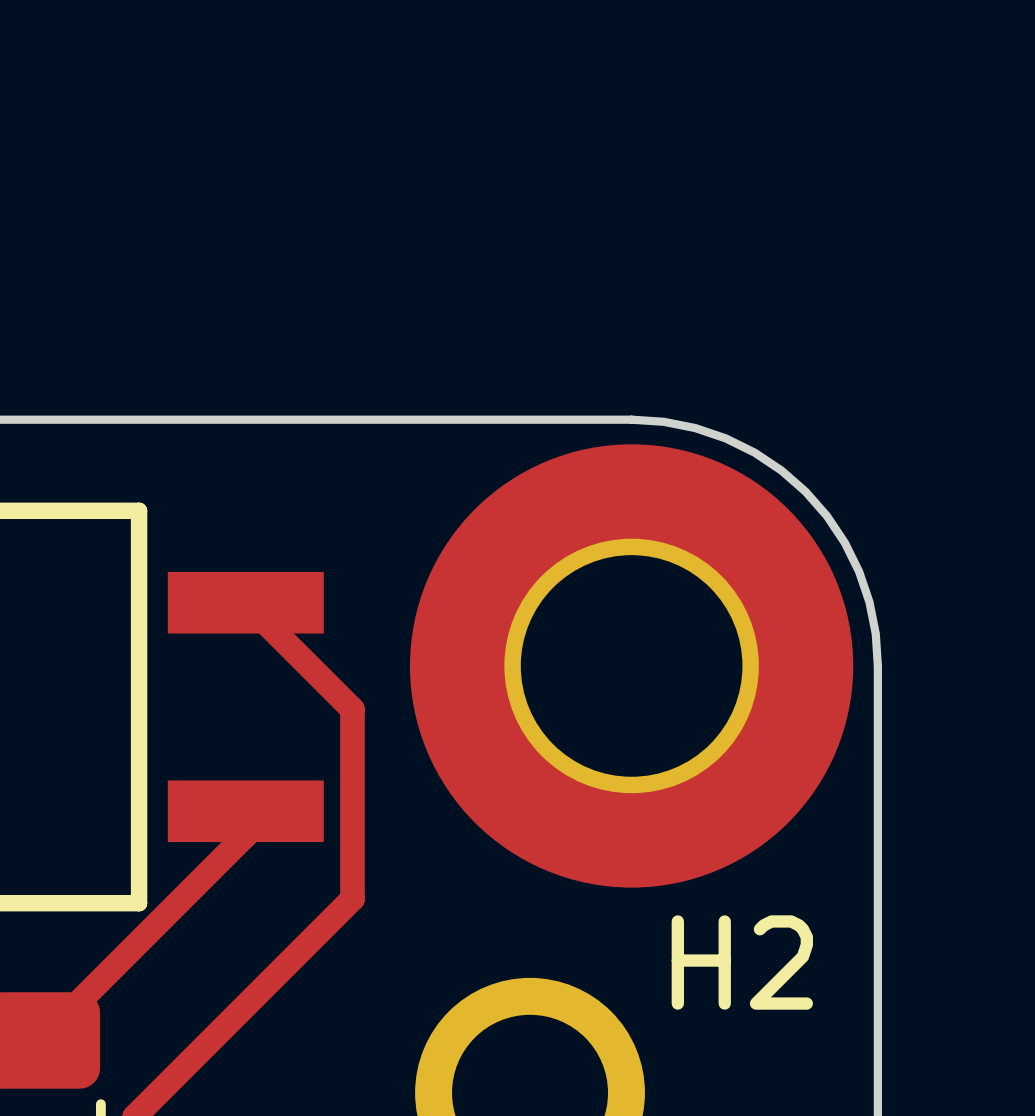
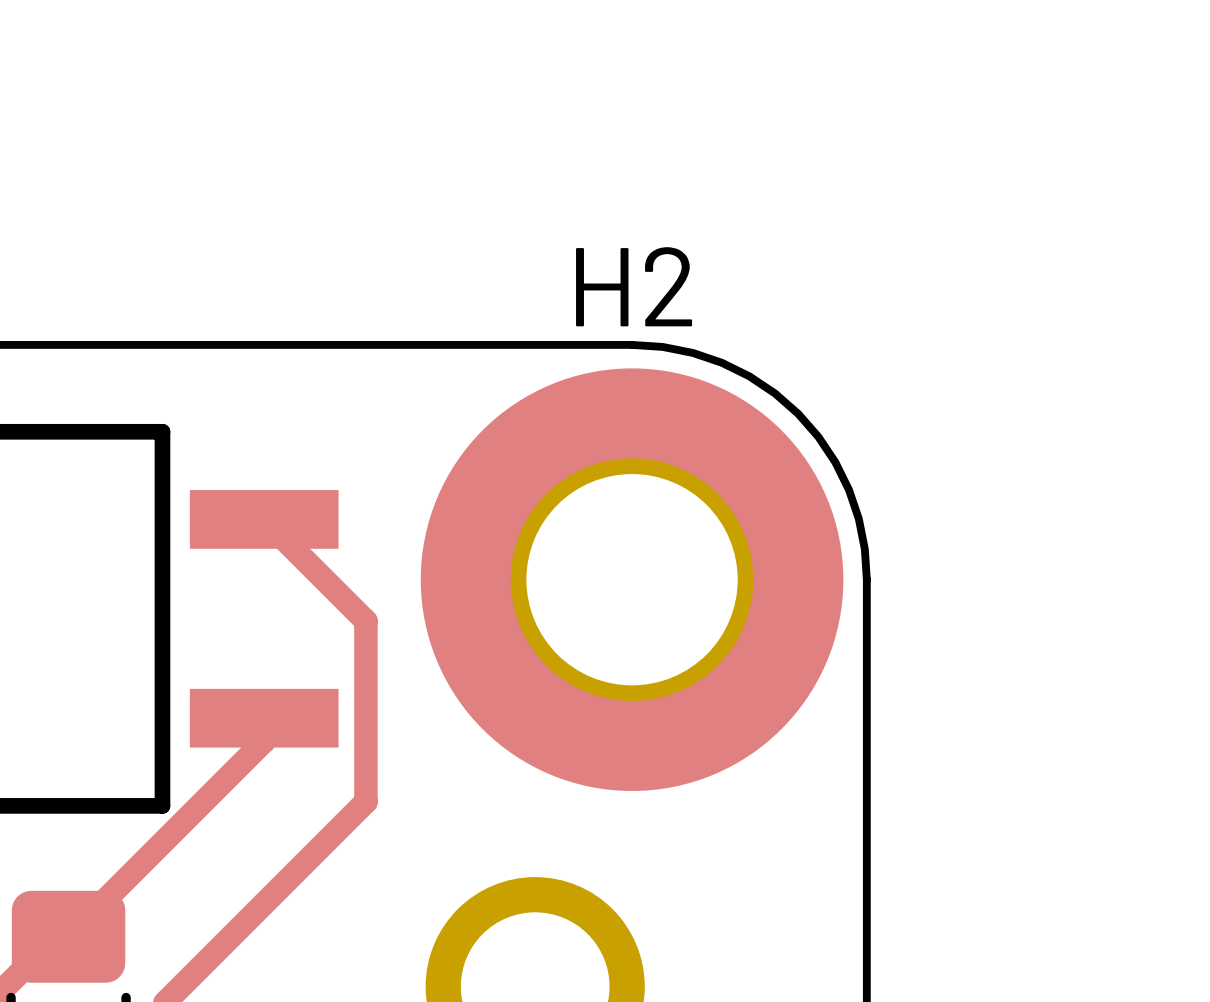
H2 name position: H2 (742, 962) -> H2 (634, 286)

